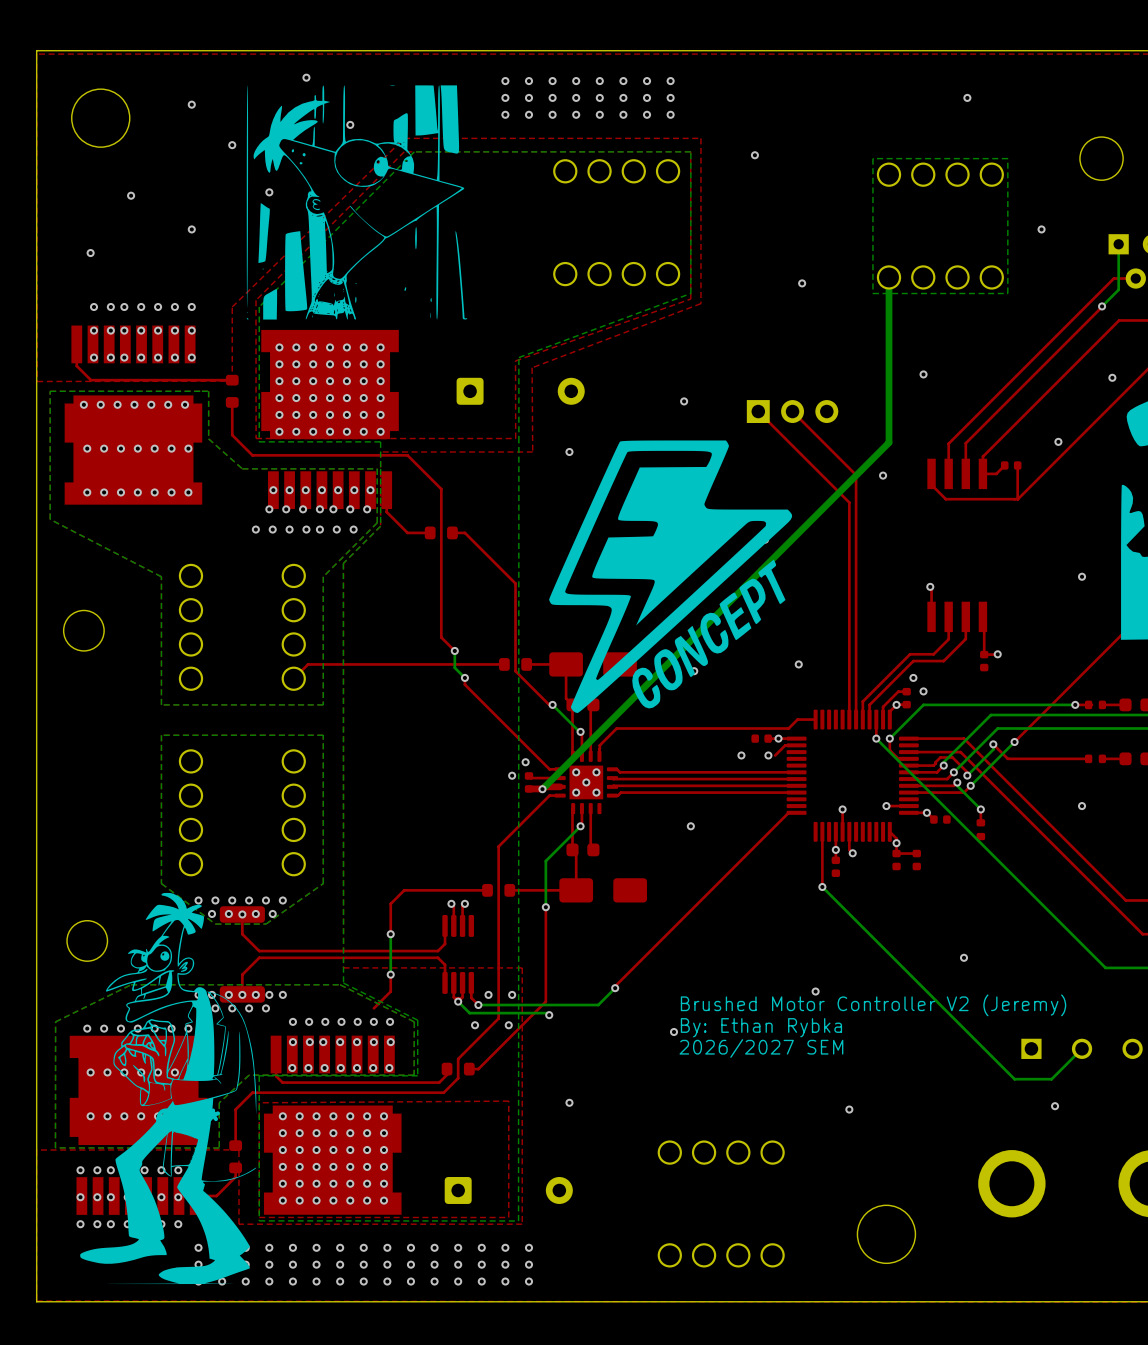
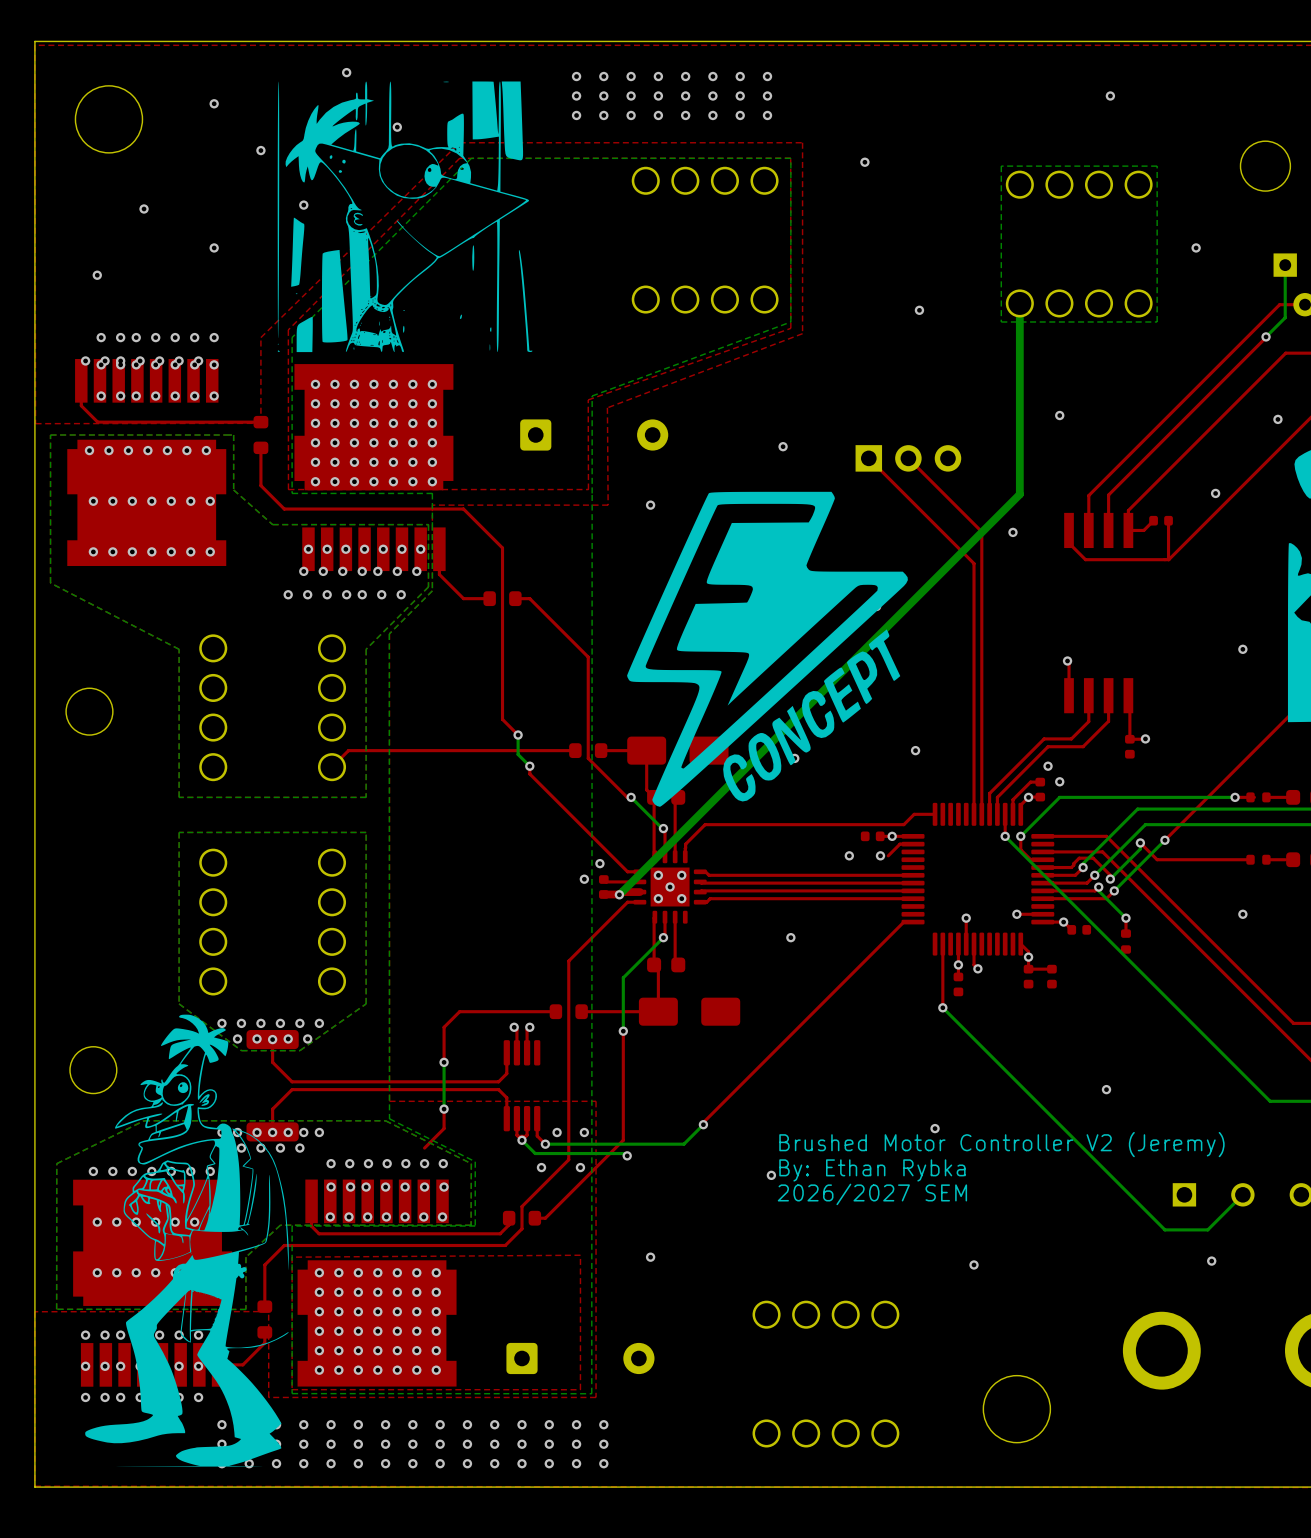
via: none -> (85, 360)
via: none -> (105, 360)
via: none -> (120, 360)
via: none -> (140, 360)
via: none -> (159, 360)
via: none -> (179, 360)
via: none -> (198, 360)

